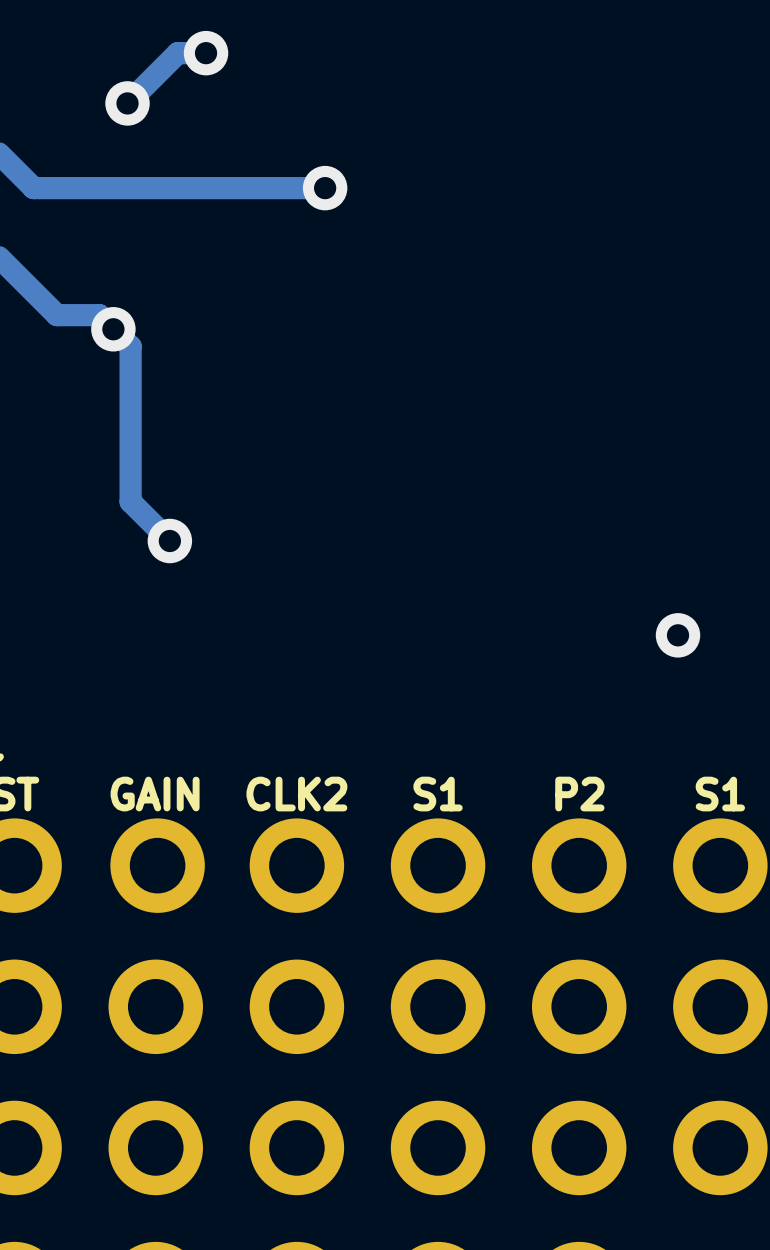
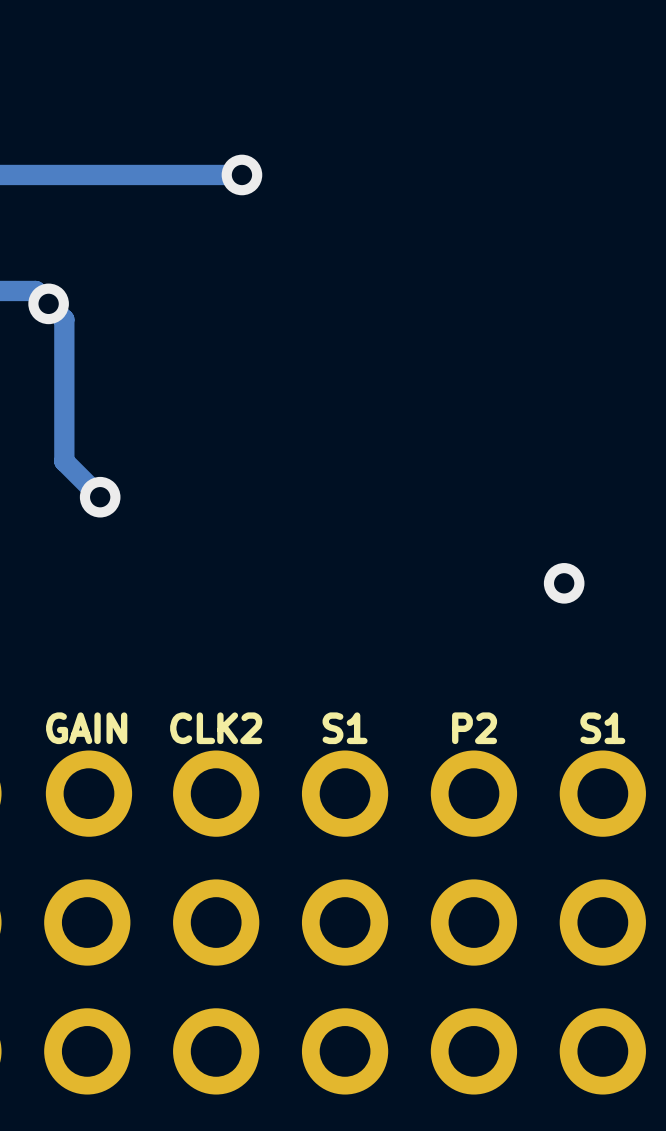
track: (206, 53) (177, 53) (127, 103) -> none
via: (206, 53) -> none
via: (127, 103) -> none

